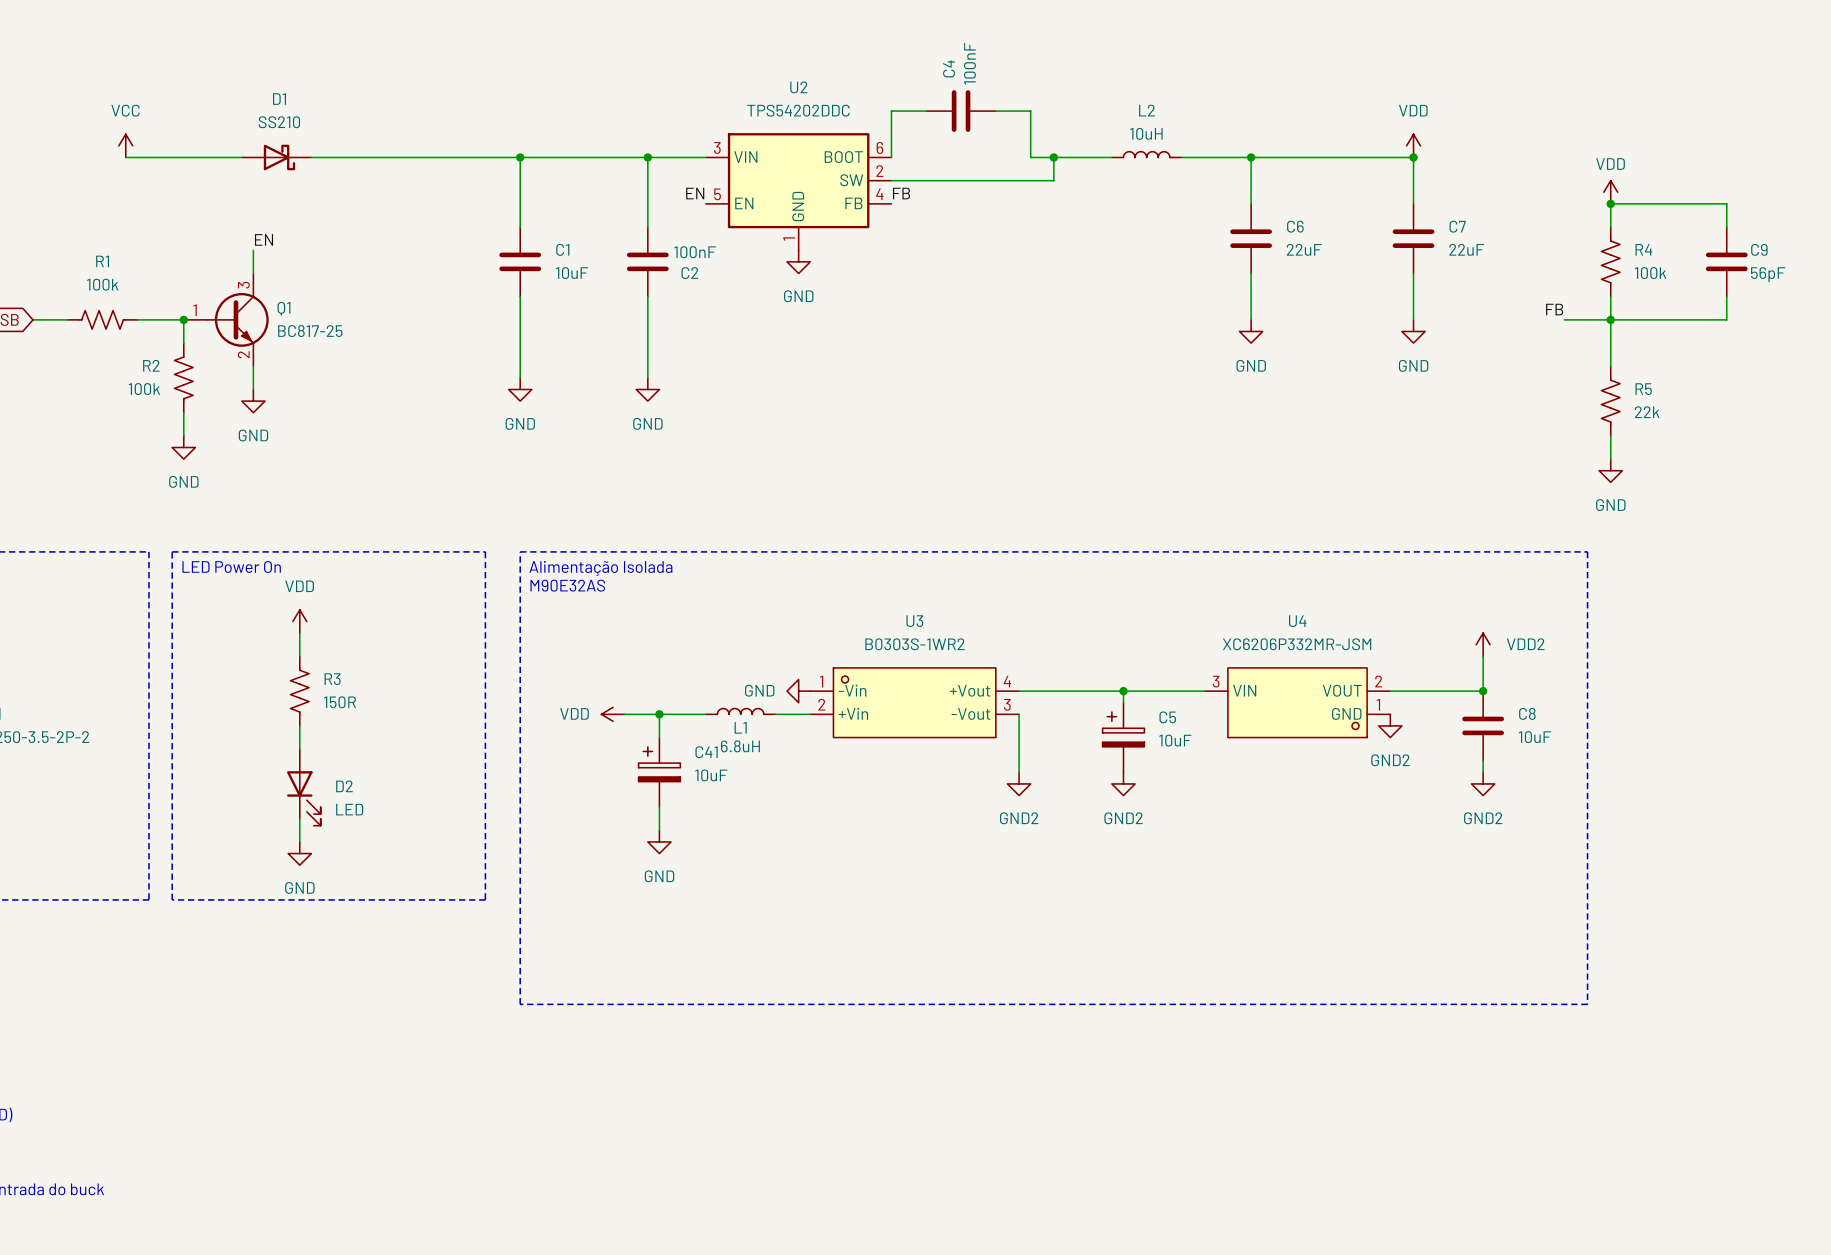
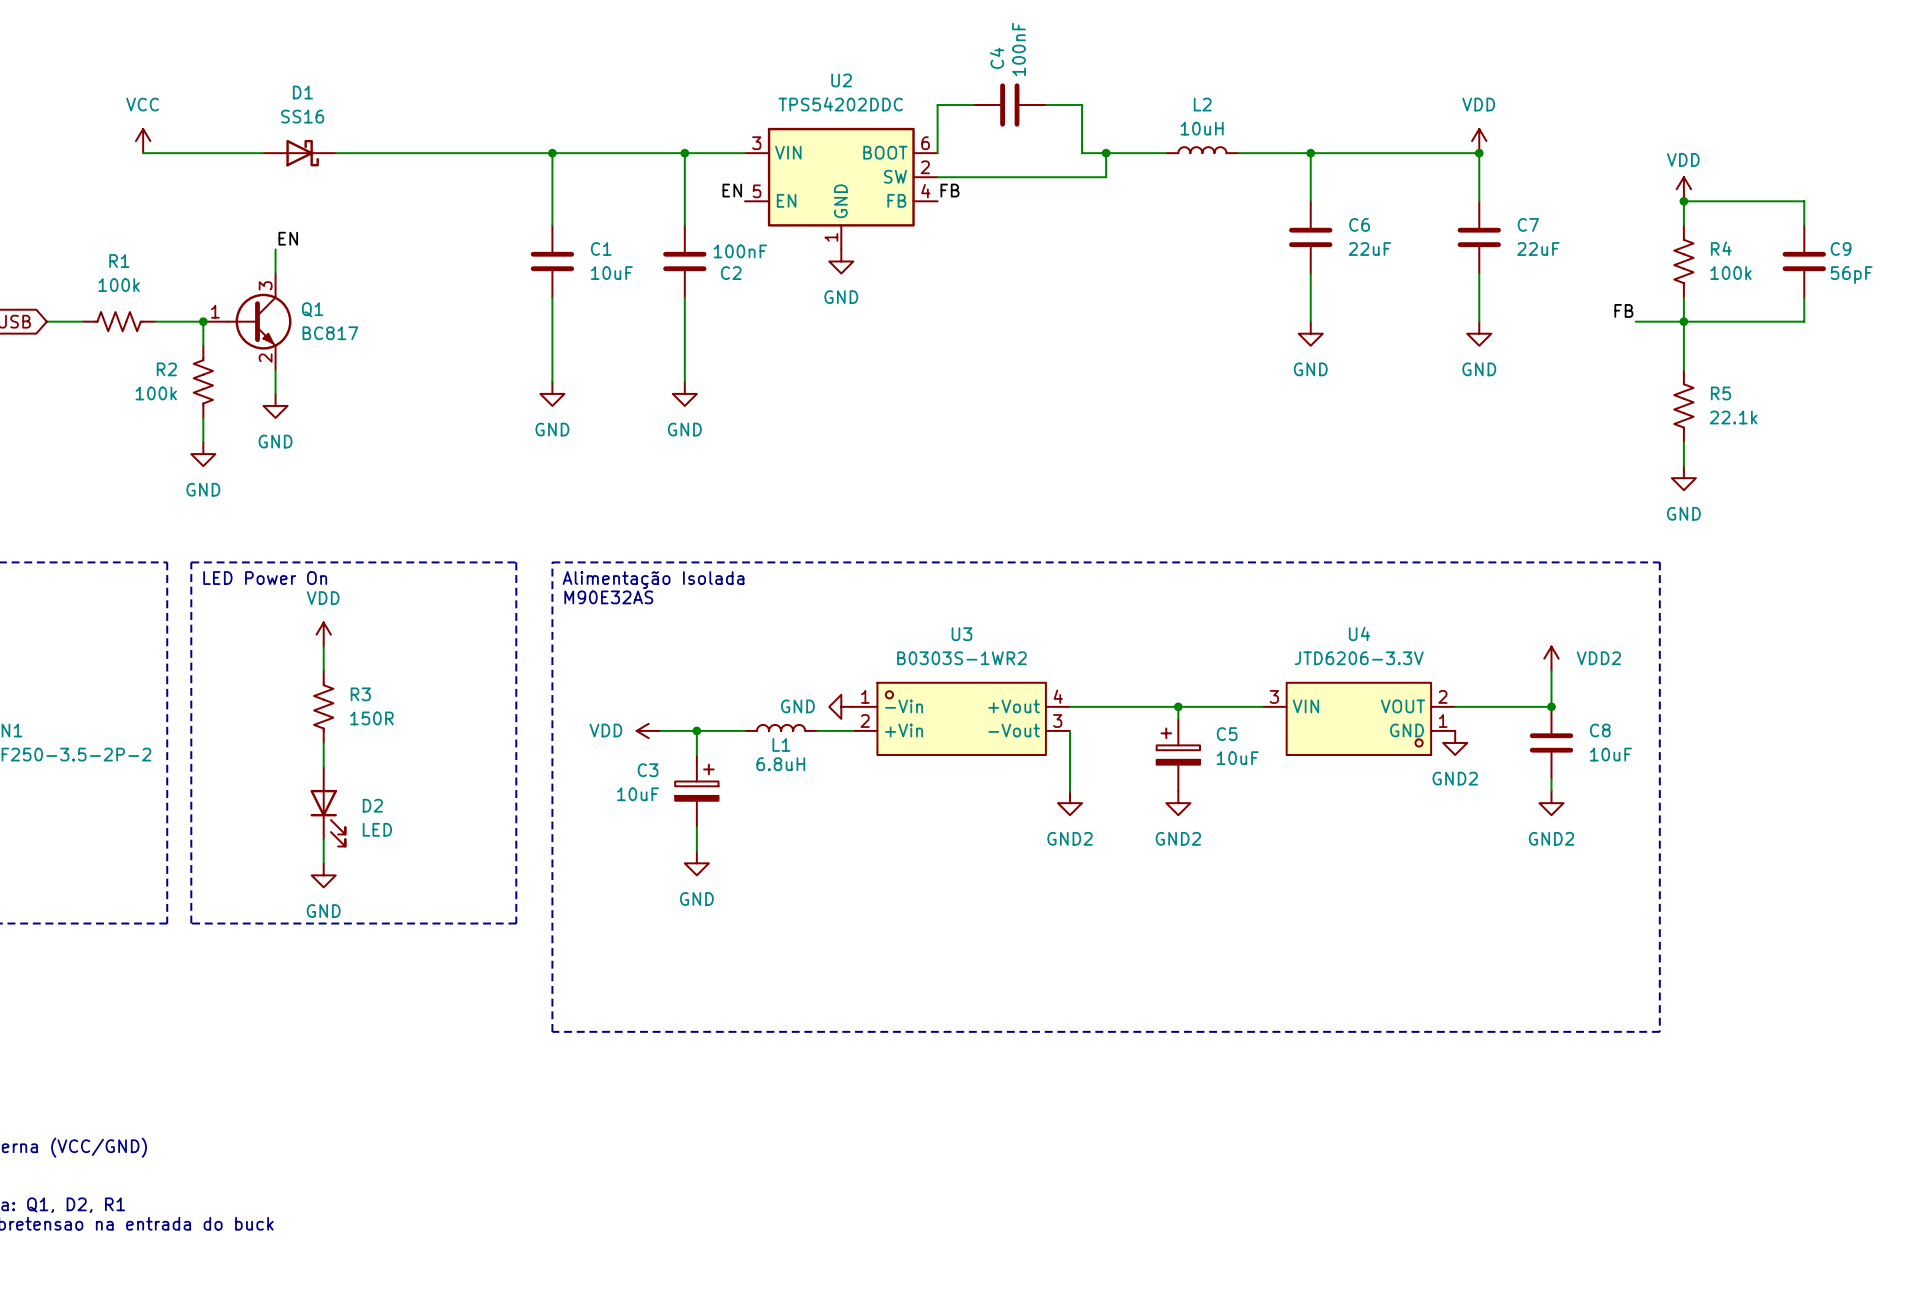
D1 value: SS210 (279, 122) -> SS16 (302, 116)
Q1 value: BC817-25 (310, 331) -> BC817 (330, 333)
R5 value: 22k (1647, 412) -> 22.1k (1733, 417)
U4 value: XC6206P332MR-JSM (1297, 644) -> JTD6206-3.3V (1359, 658)
C41: 10uF (659, 772) -> none
C3: none -> 10uF (696, 791)

